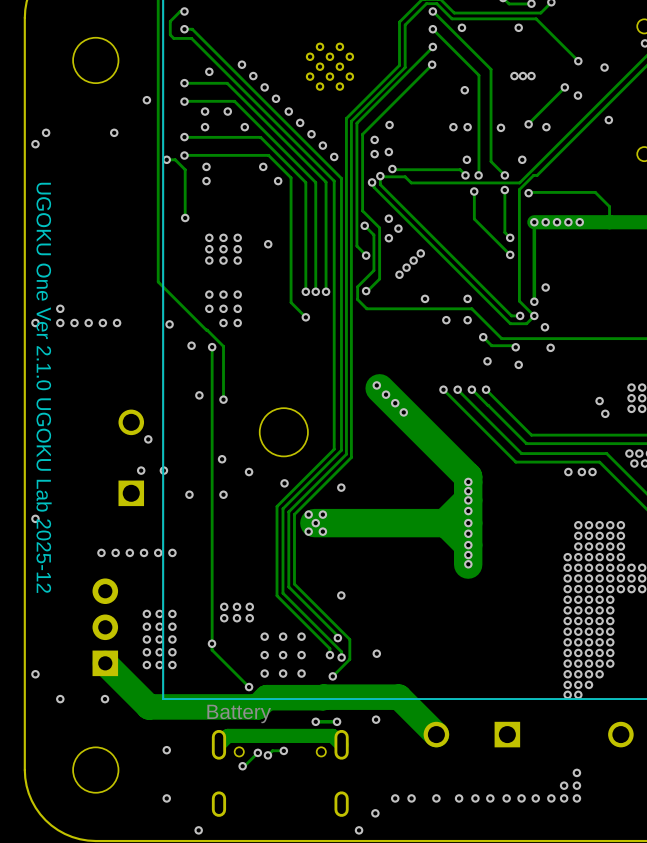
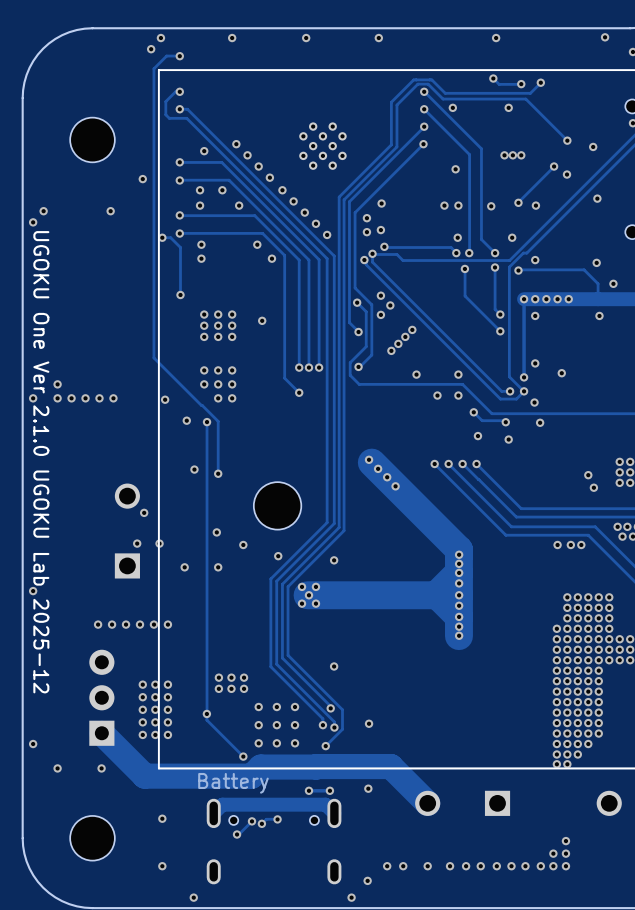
via: none -> (535, 260)
via: none -> (596, 262)
via: none -> (613, 283)
via: none -> (535, 315)
via: none -> (599, 315)
via: none -> (561, 373)

